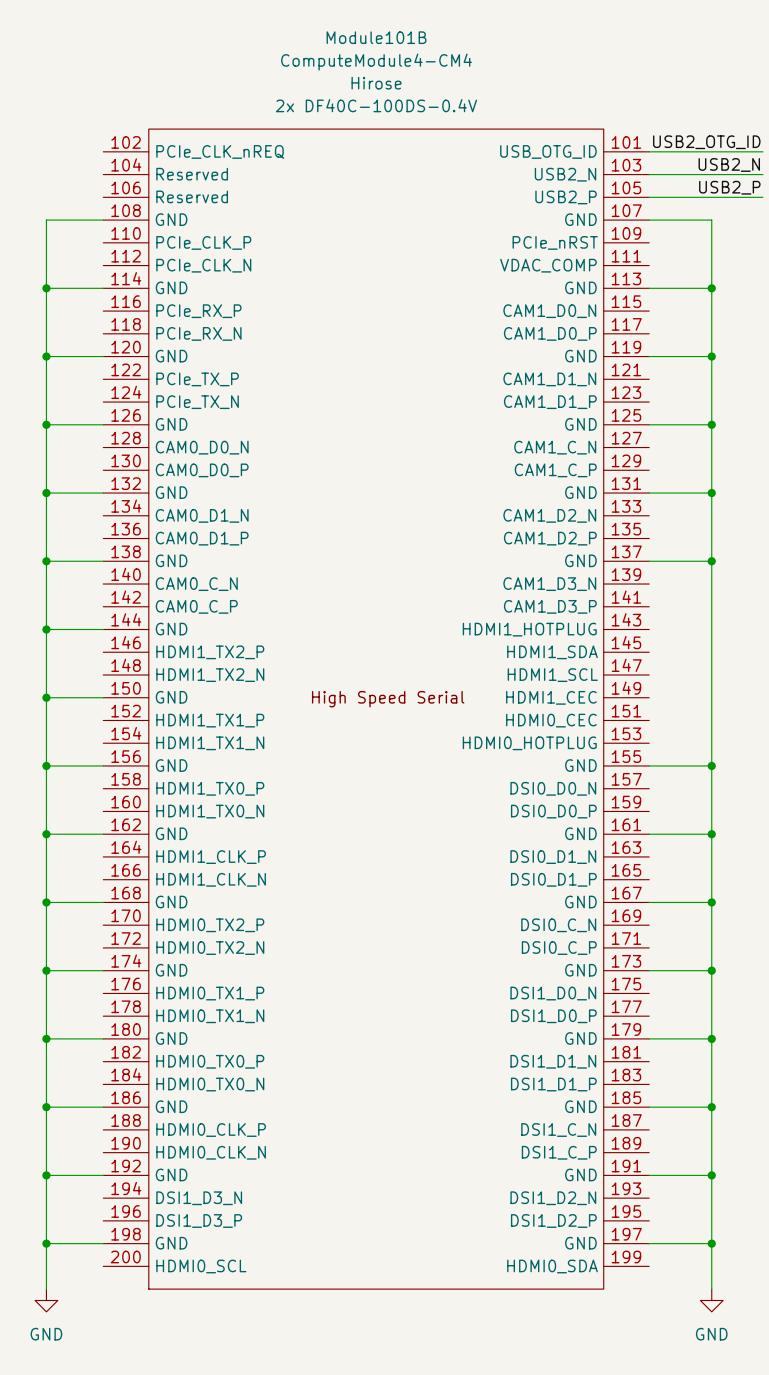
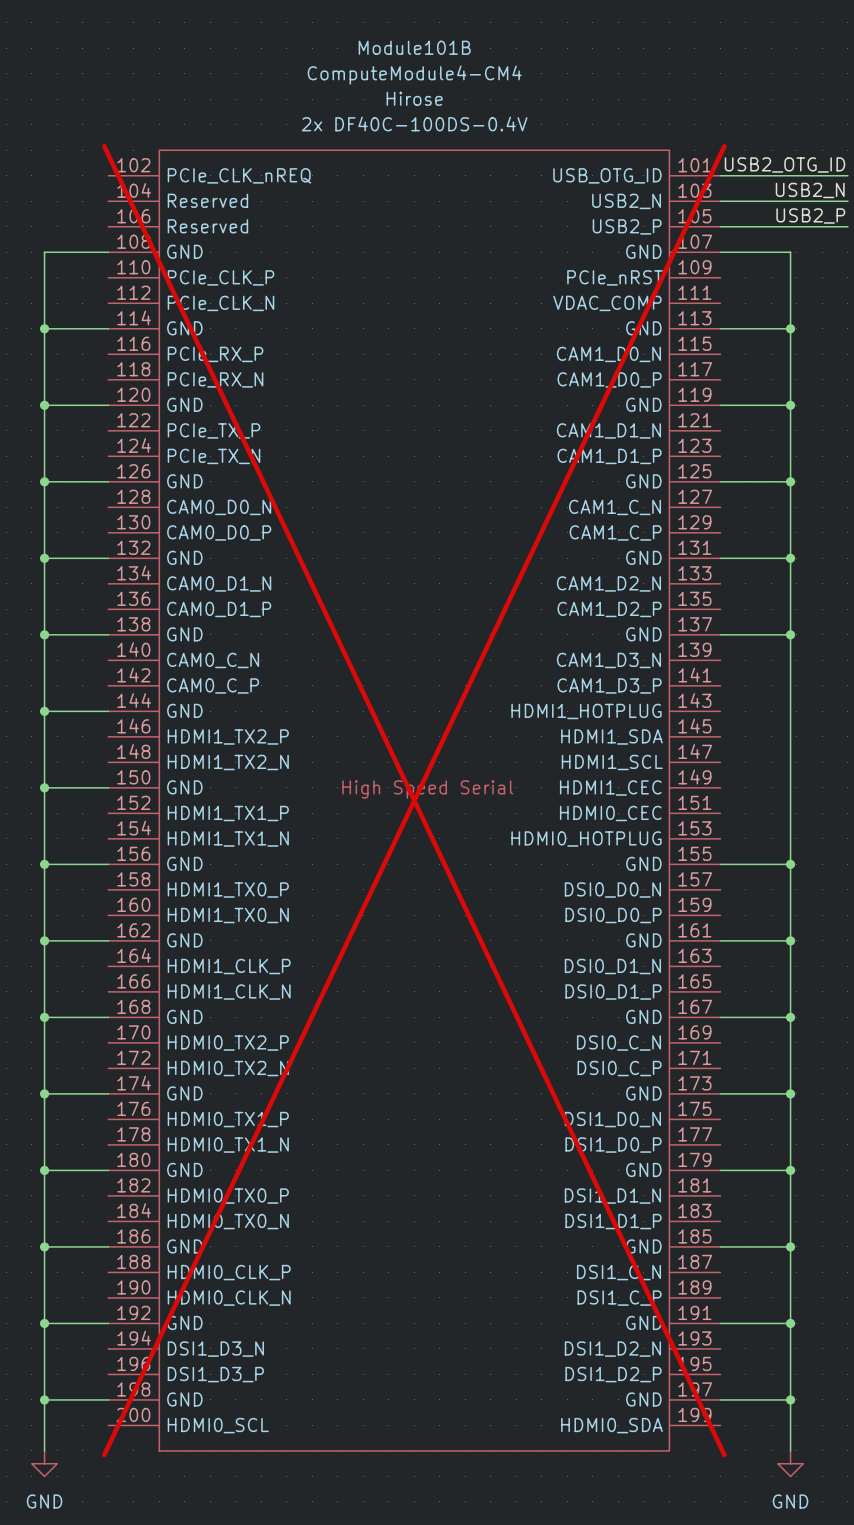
Module101B do-not-place cross: none -> (414, 800)

